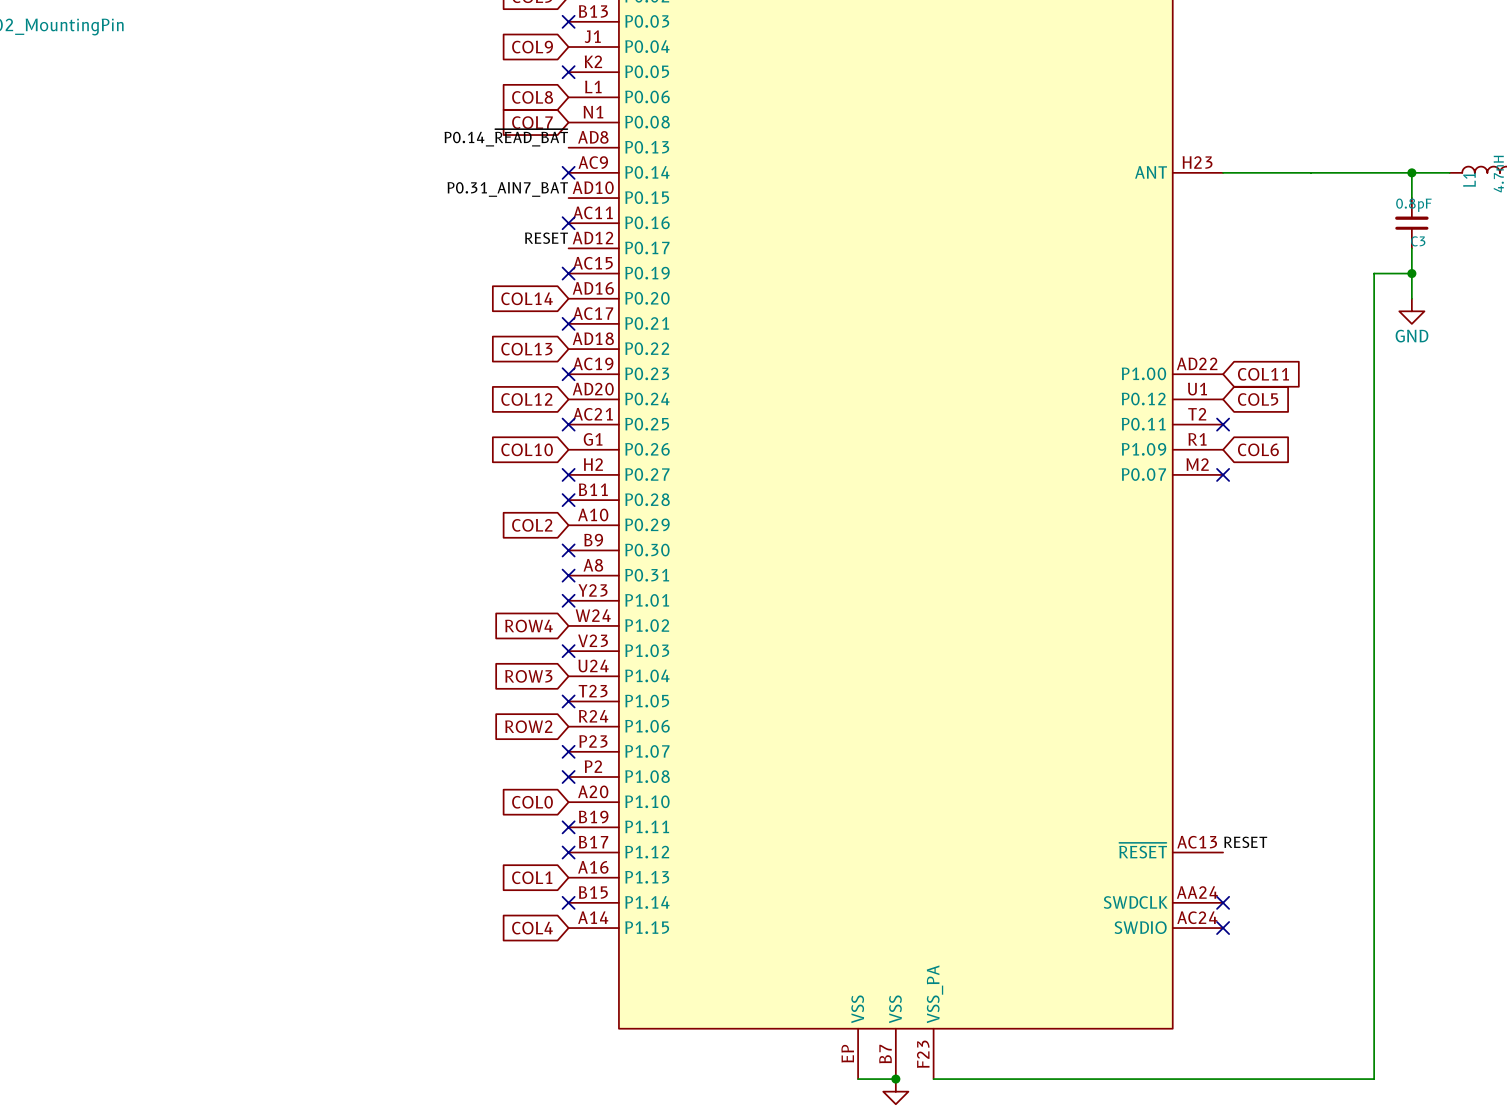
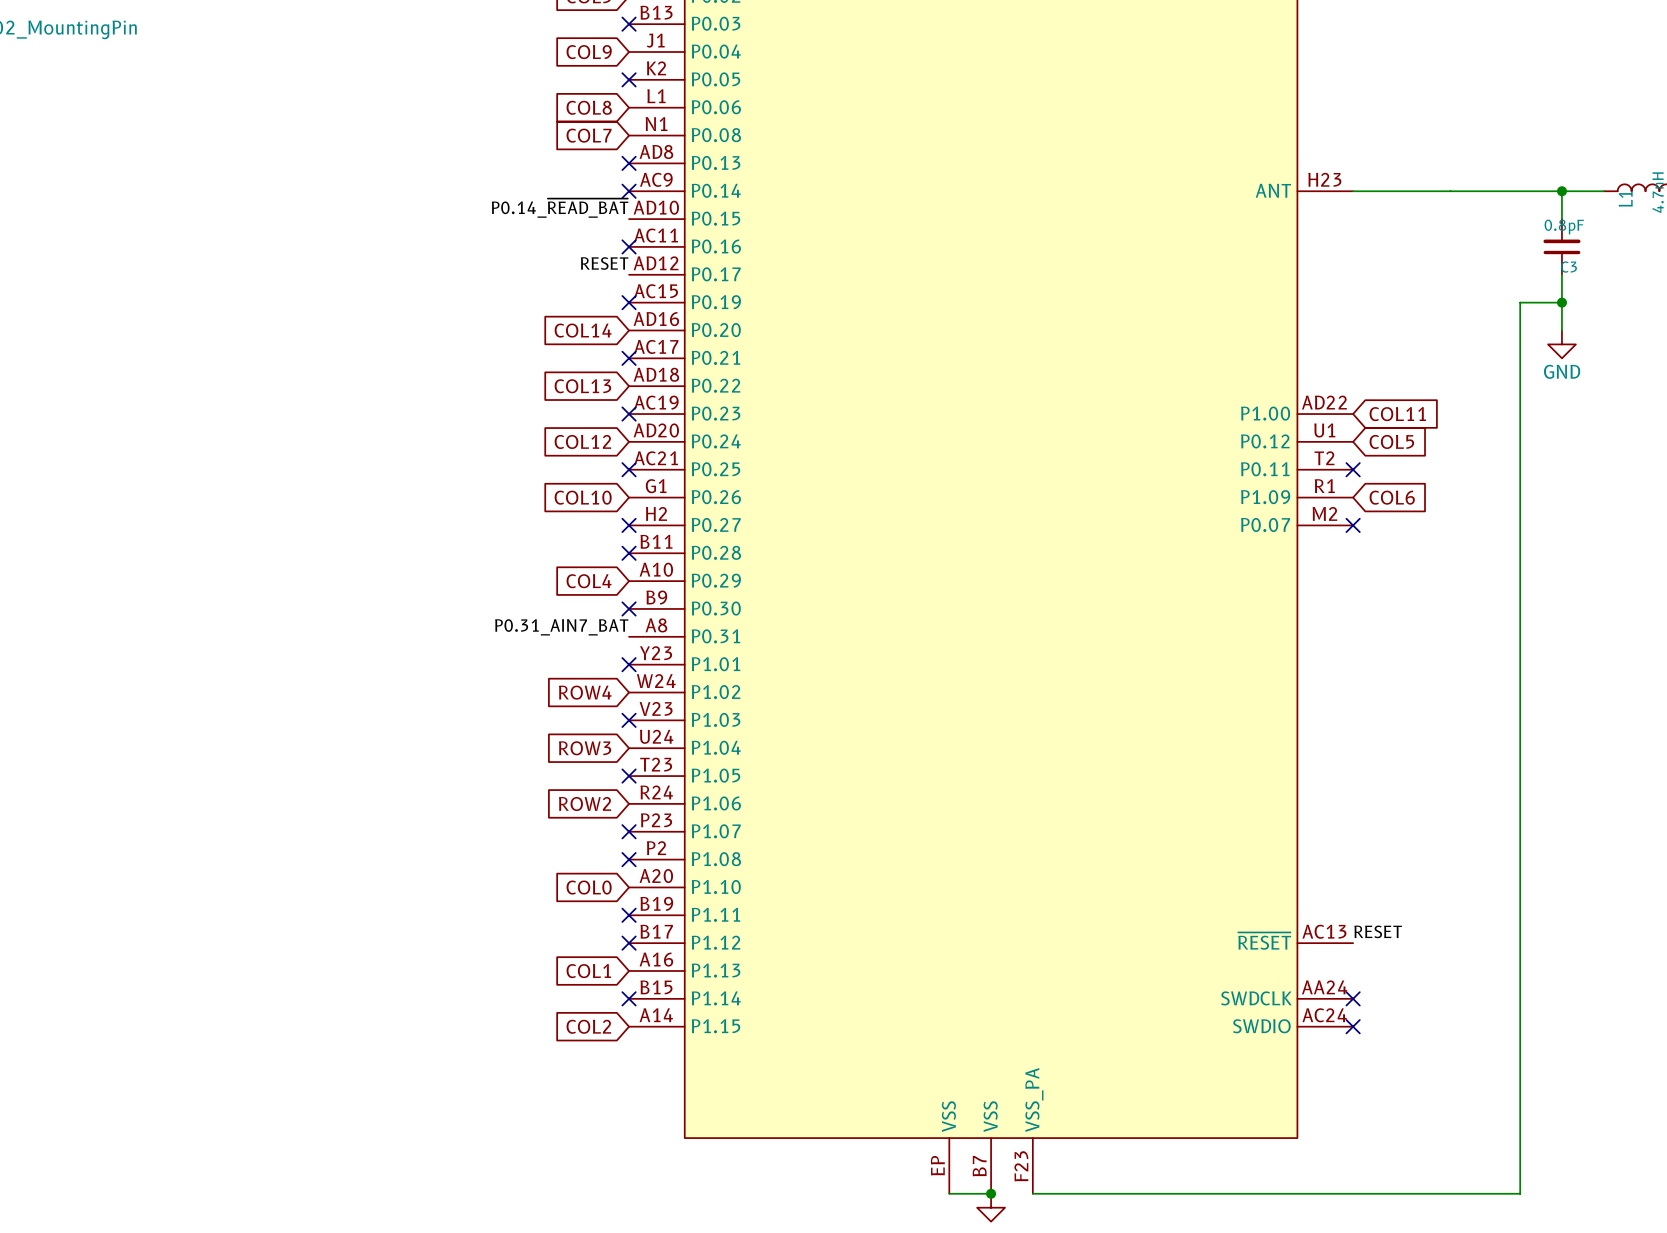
label: P0.14_~{READ_BAT} (506, 137) -> none
no-connect mark: none -> (629, 163)
label: P0.31_AIN7_BAT (507, 189) -> P0.14_~{READ_BAT} (560, 208)
global label: COL2 (532, 525) -> COL4 (589, 581)
label: none -> P0.31_AIN7_BAT (561, 627)
no-connect mark: (568, 575) -> none
global label: COL4 (532, 928) -> COL2 (588, 1026)

